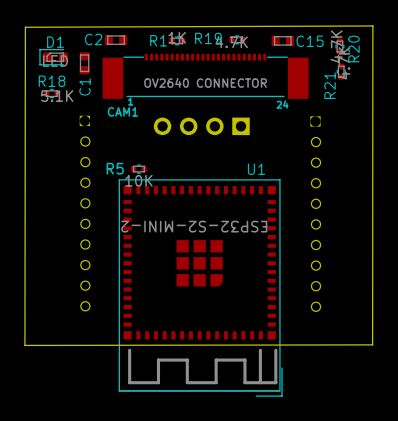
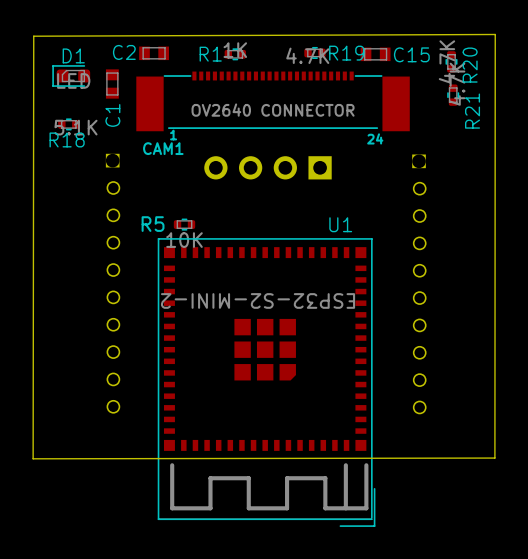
R19 name position: R19 (208, 38) -> R19 (346, 53)
R18 name position: R18 (52, 81) -> R18 (67, 139)
R21 name position: R21 (330, 85) -> R21 (472, 111)

